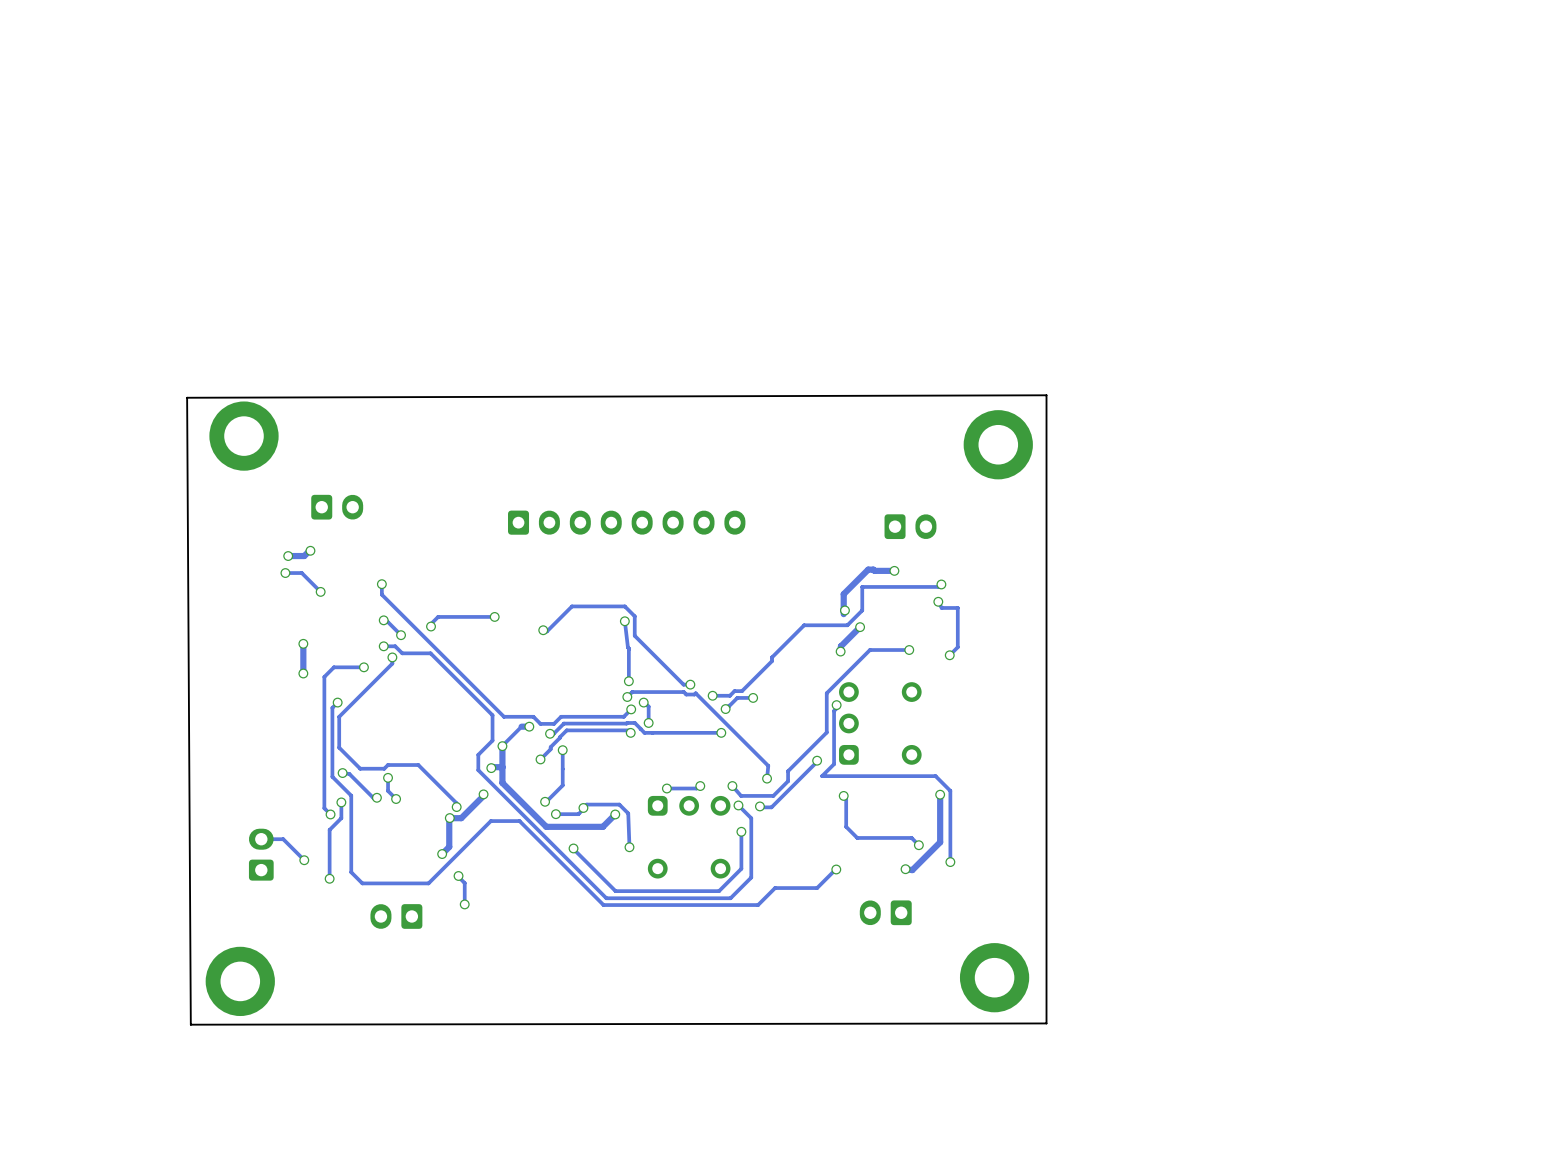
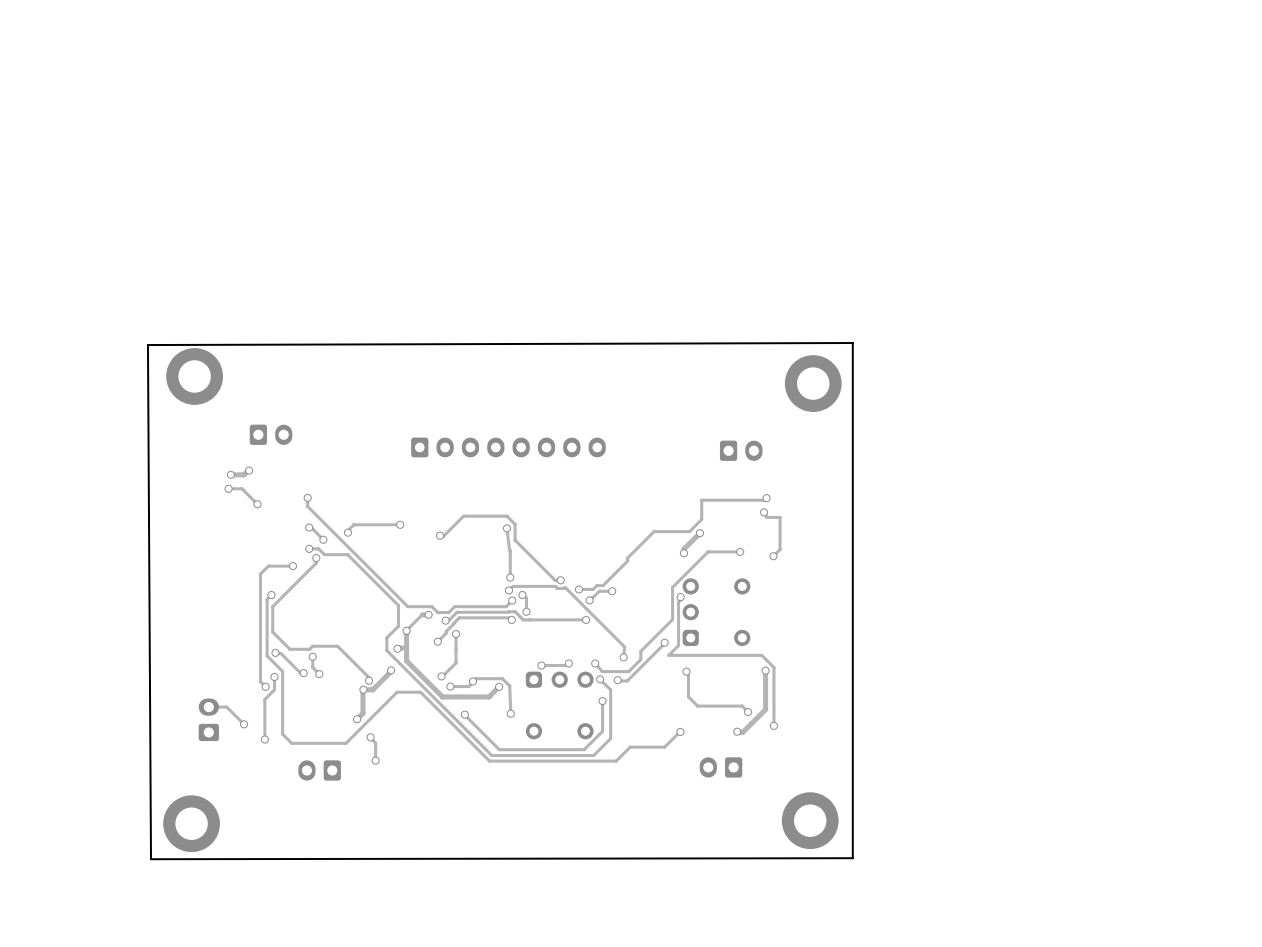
track: (894, 570) (868, 569) (843, 594) (843, 614) -> none
via: (894, 570) -> none
via: (844, 610) -> none
track: (303, 643) (303, 673) -> none
via: (303, 643) -> none
via: (303, 673) -> none

